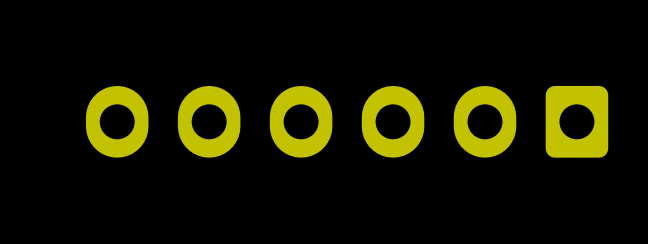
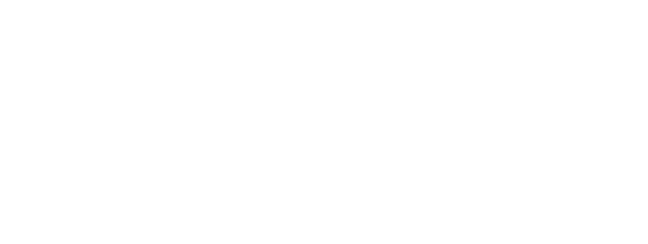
part: (347, 121) -> none

